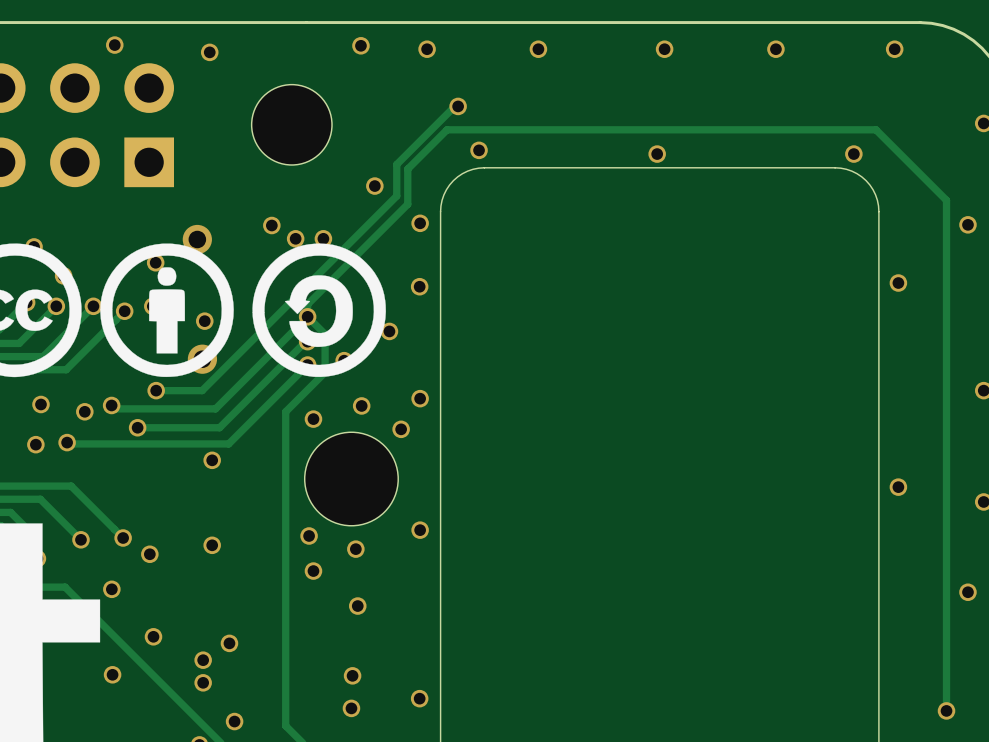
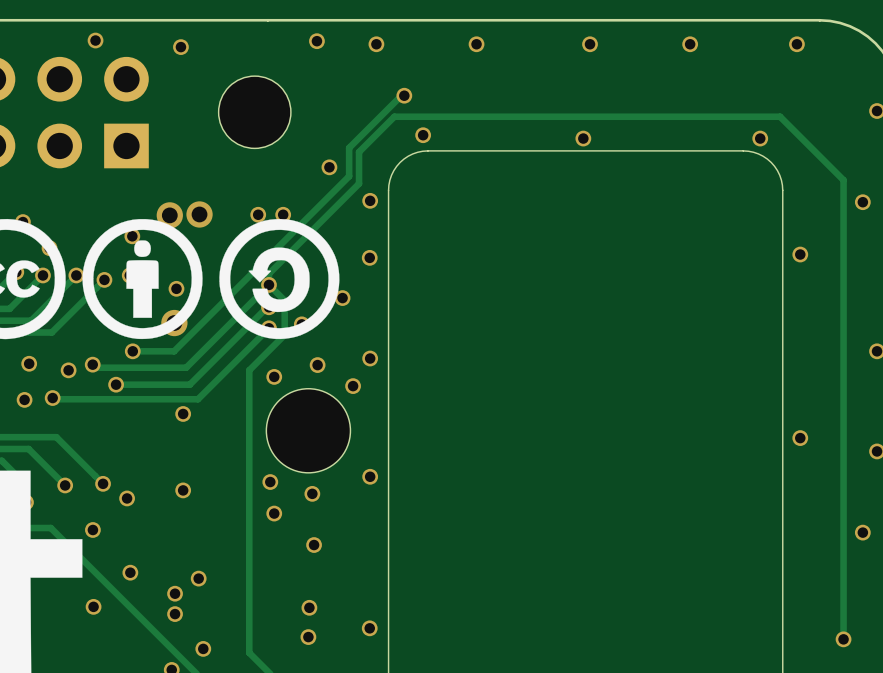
via: (271, 225) -> none
via: none -> (199, 214)

